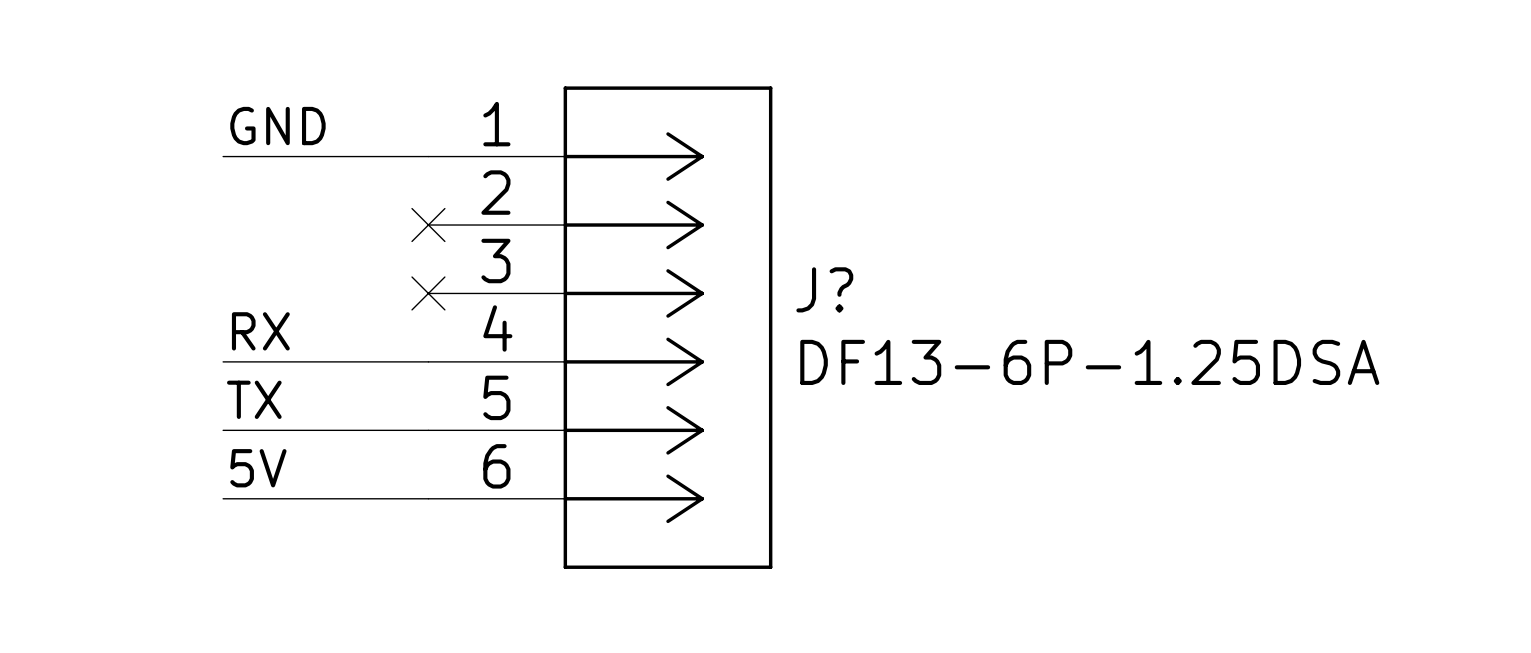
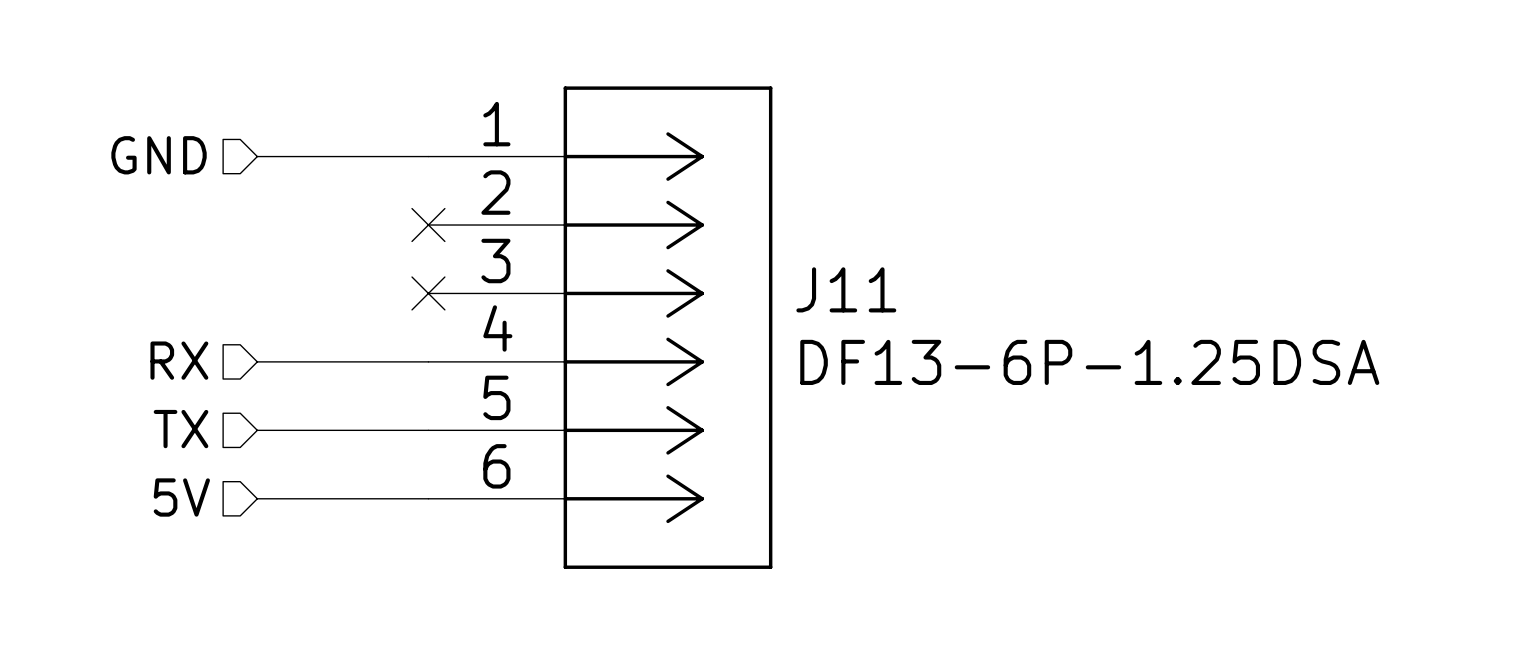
label: GND (277, 126) -> none
hierarchical label: none -> GND (159, 155)
wire: (223, 156) (257, 156) -> none
J? name: J? (824, 289) -> J11 (846, 289)
label: RX (260, 331) -> none
hierarchical label: none -> RX (179, 360)
wire: (223, 361) (257, 361) -> none
label: TX (254, 399) -> none
hierarchical label: none -> TX (181, 429)
wire: (223, 430) (257, 430) -> none
label: 5V (258, 468) -> none
hierarchical label: none -> 5V (181, 497)
wire: (223, 498) (257, 498) -> none

